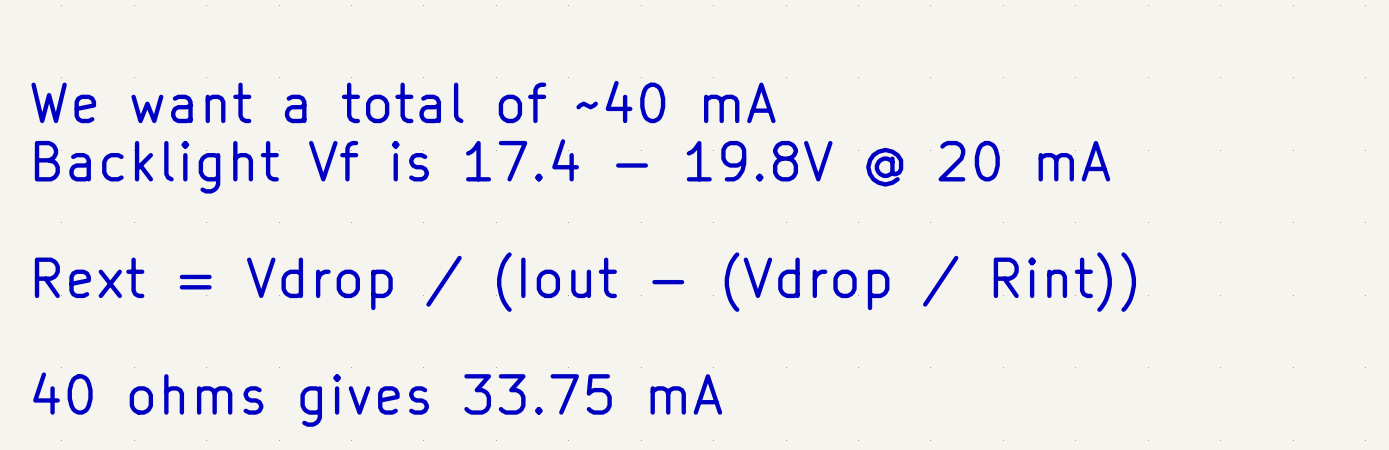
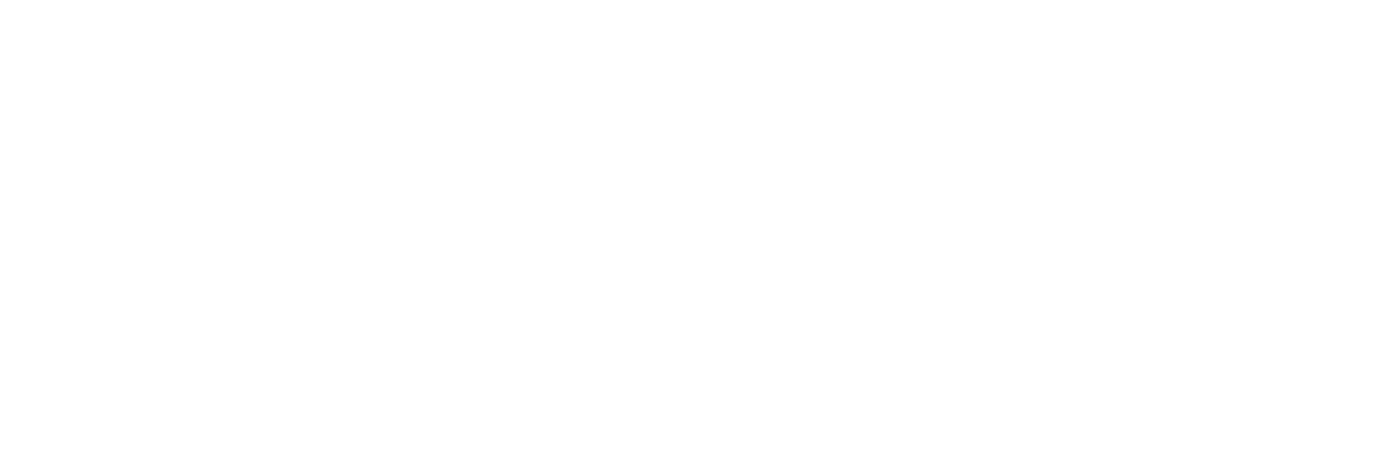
text: We want a total of ~40 mA (403, 102) -> none
text: Backlight Vf is 17.4 - 19.8V @ 20 mA (572, 166) -> none
text: Rext = Vdrop / (Iout - (Vdrop / Rint)) (585, 282) -> none
text: 40 ohms gives 33.75 mA (377, 399) -> none

